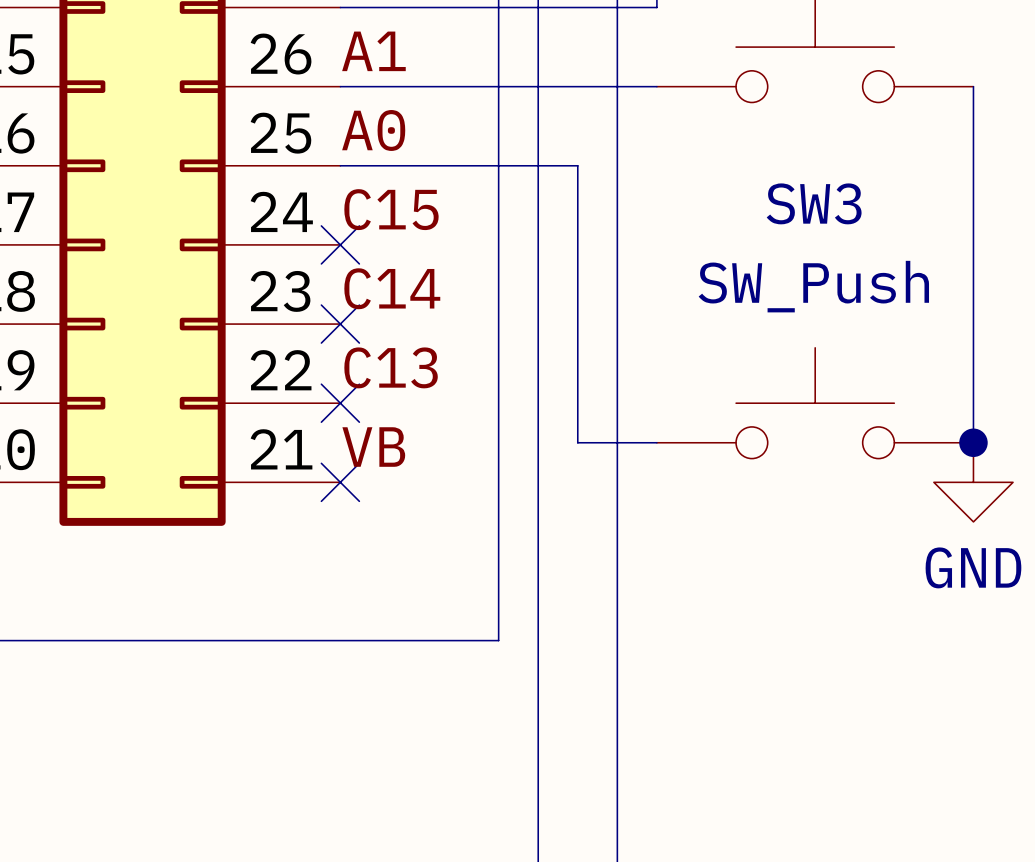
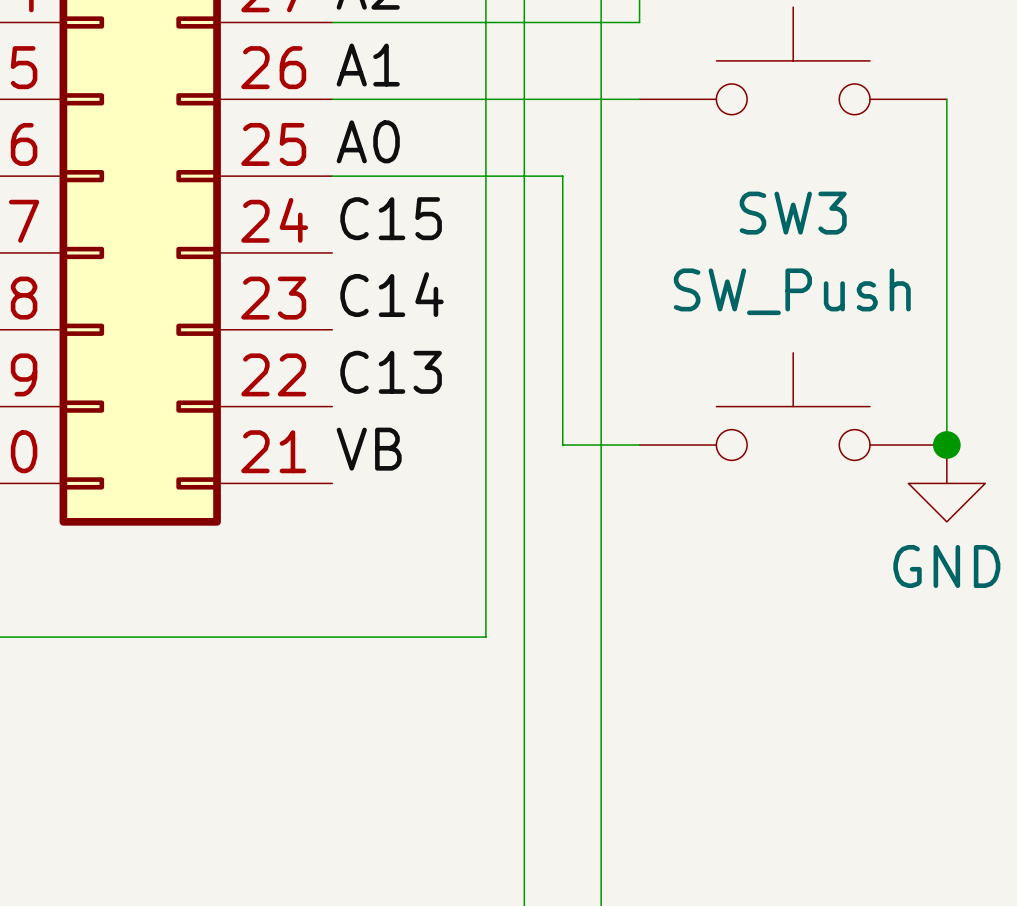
no-connect mark: (340, 244) -> none
no-connect mark: (340, 324) -> none
no-connect mark: (340, 403) -> none
no-connect mark: (340, 482) -> none

